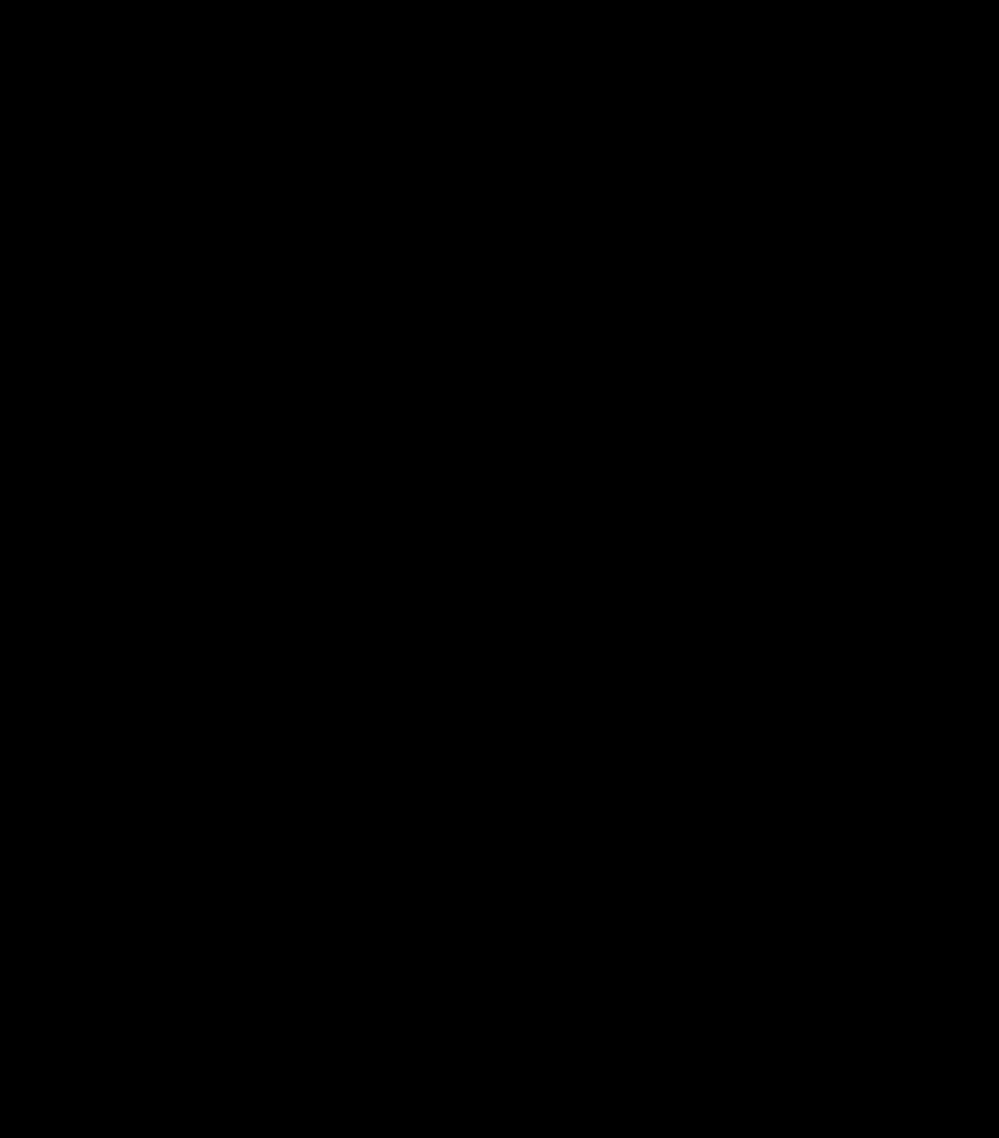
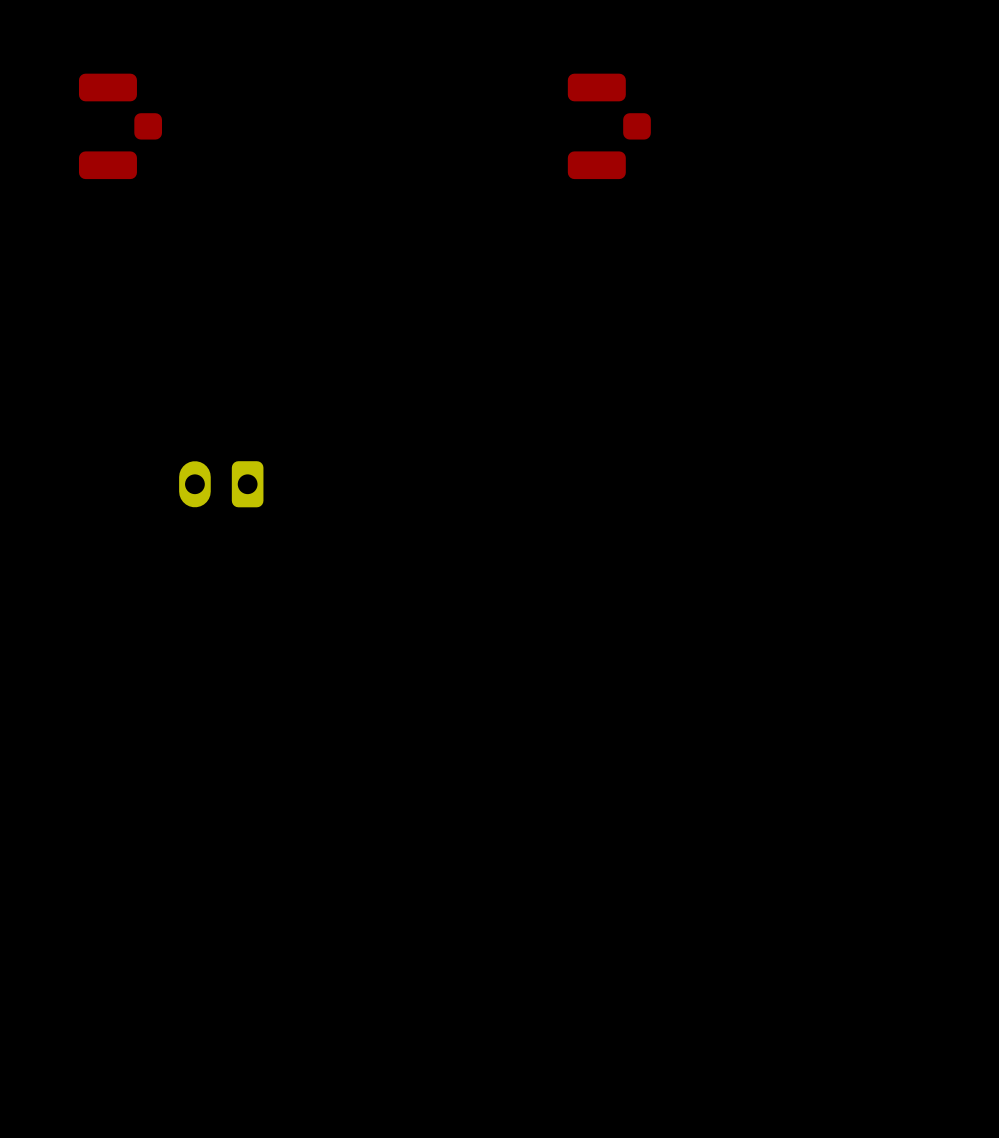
part: none -> (120, 126)
part: none -> (609, 126)
part: none -> (221, 484)

